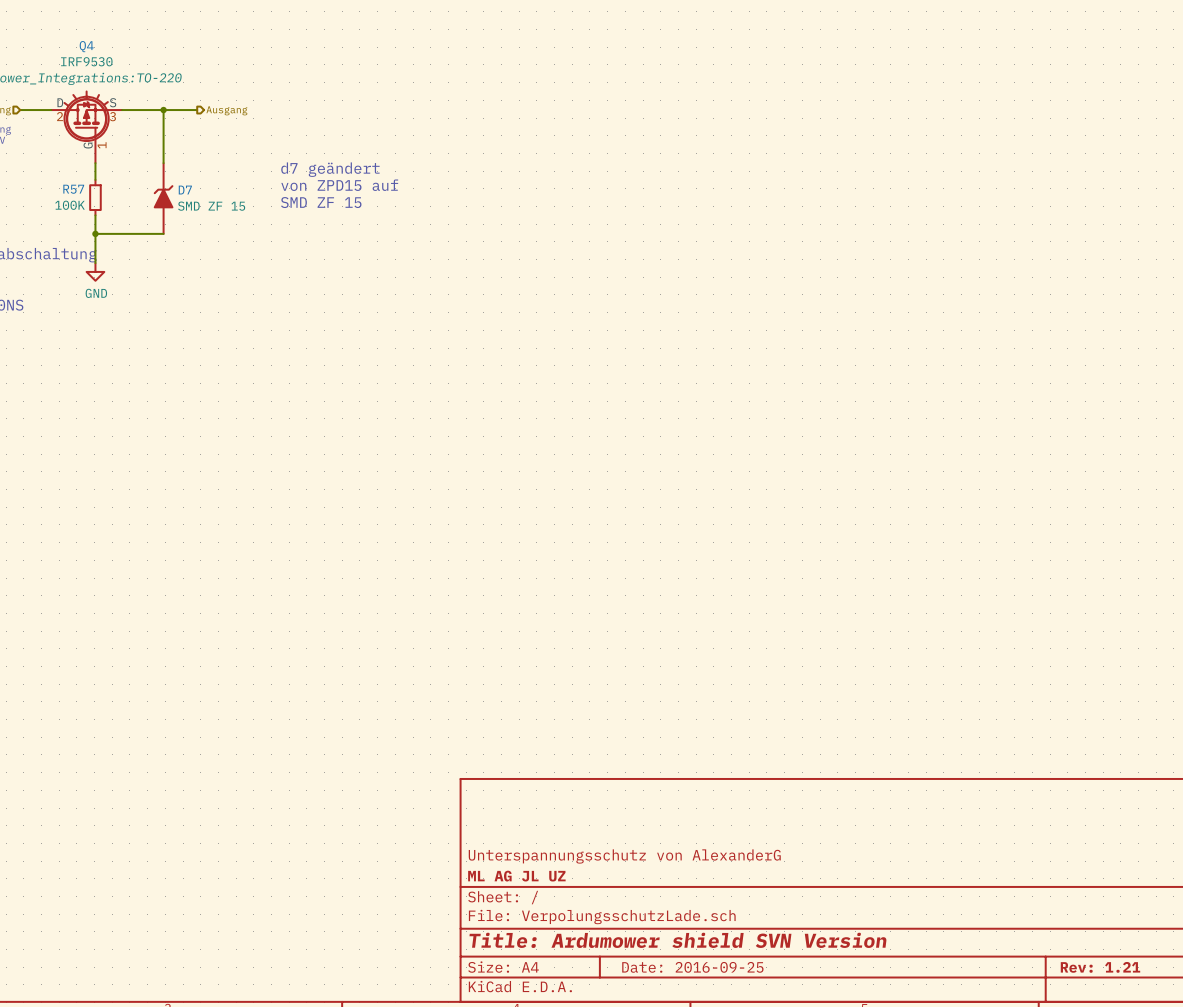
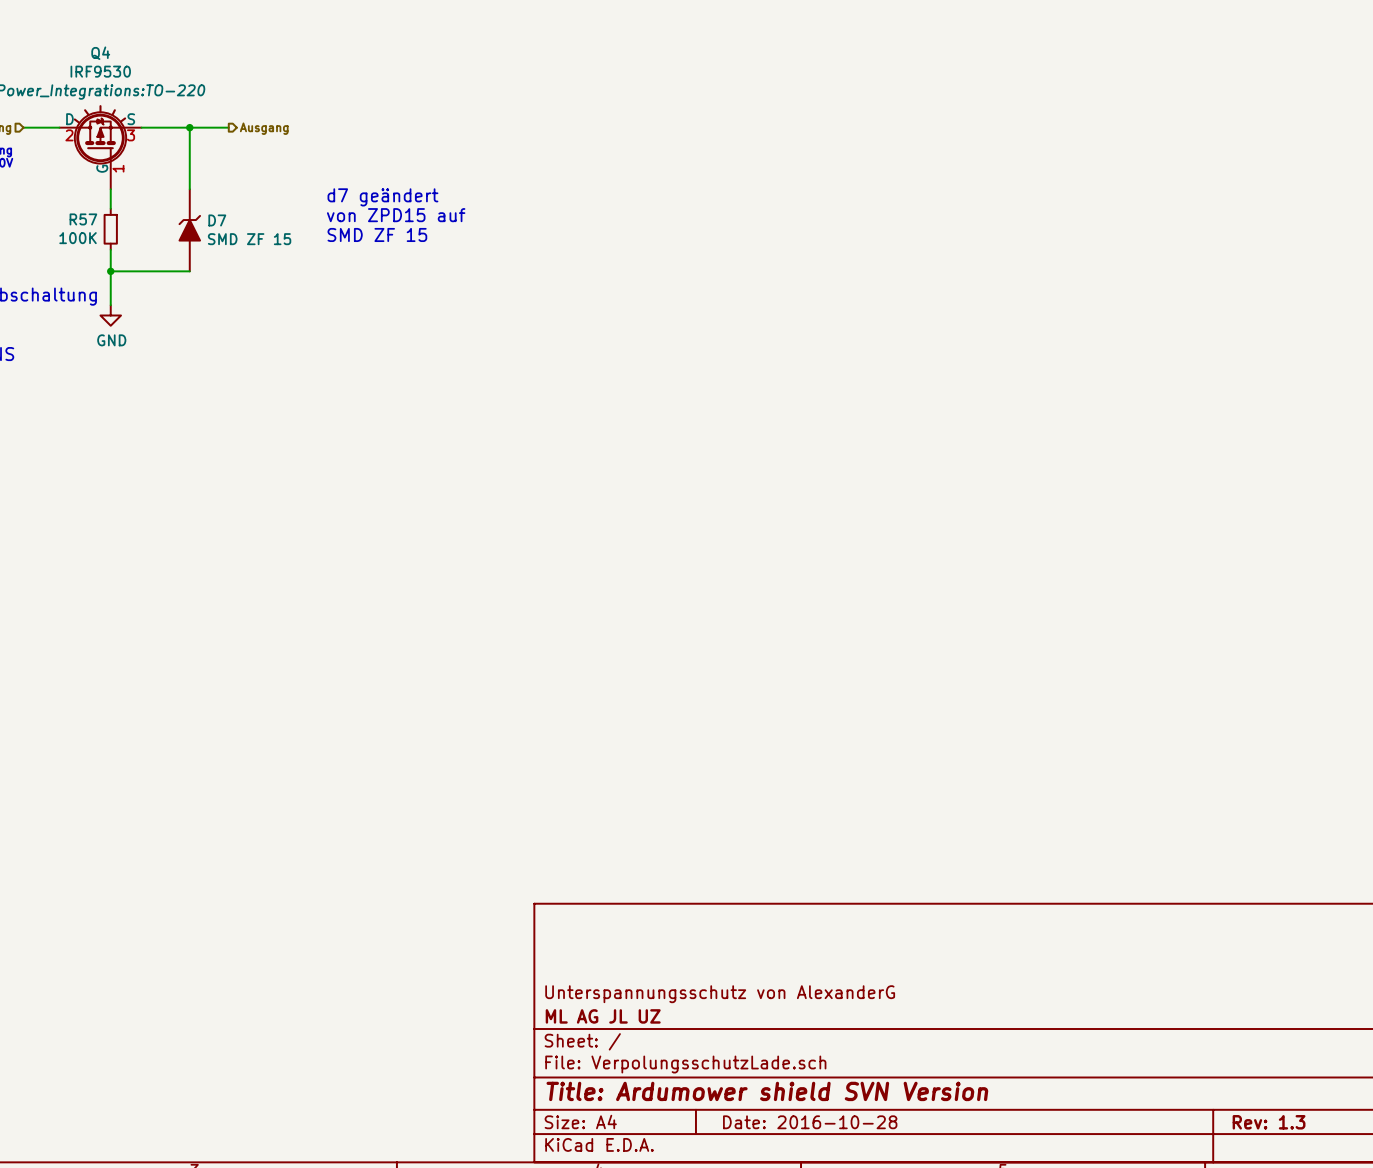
title block: Date: 2016-09-25 (692, 967) -> Date: 2016-10-28 (810, 1122)
title block: Rev: 1.21 (1100, 967) -> Rev: 1.3 (1269, 1122)

